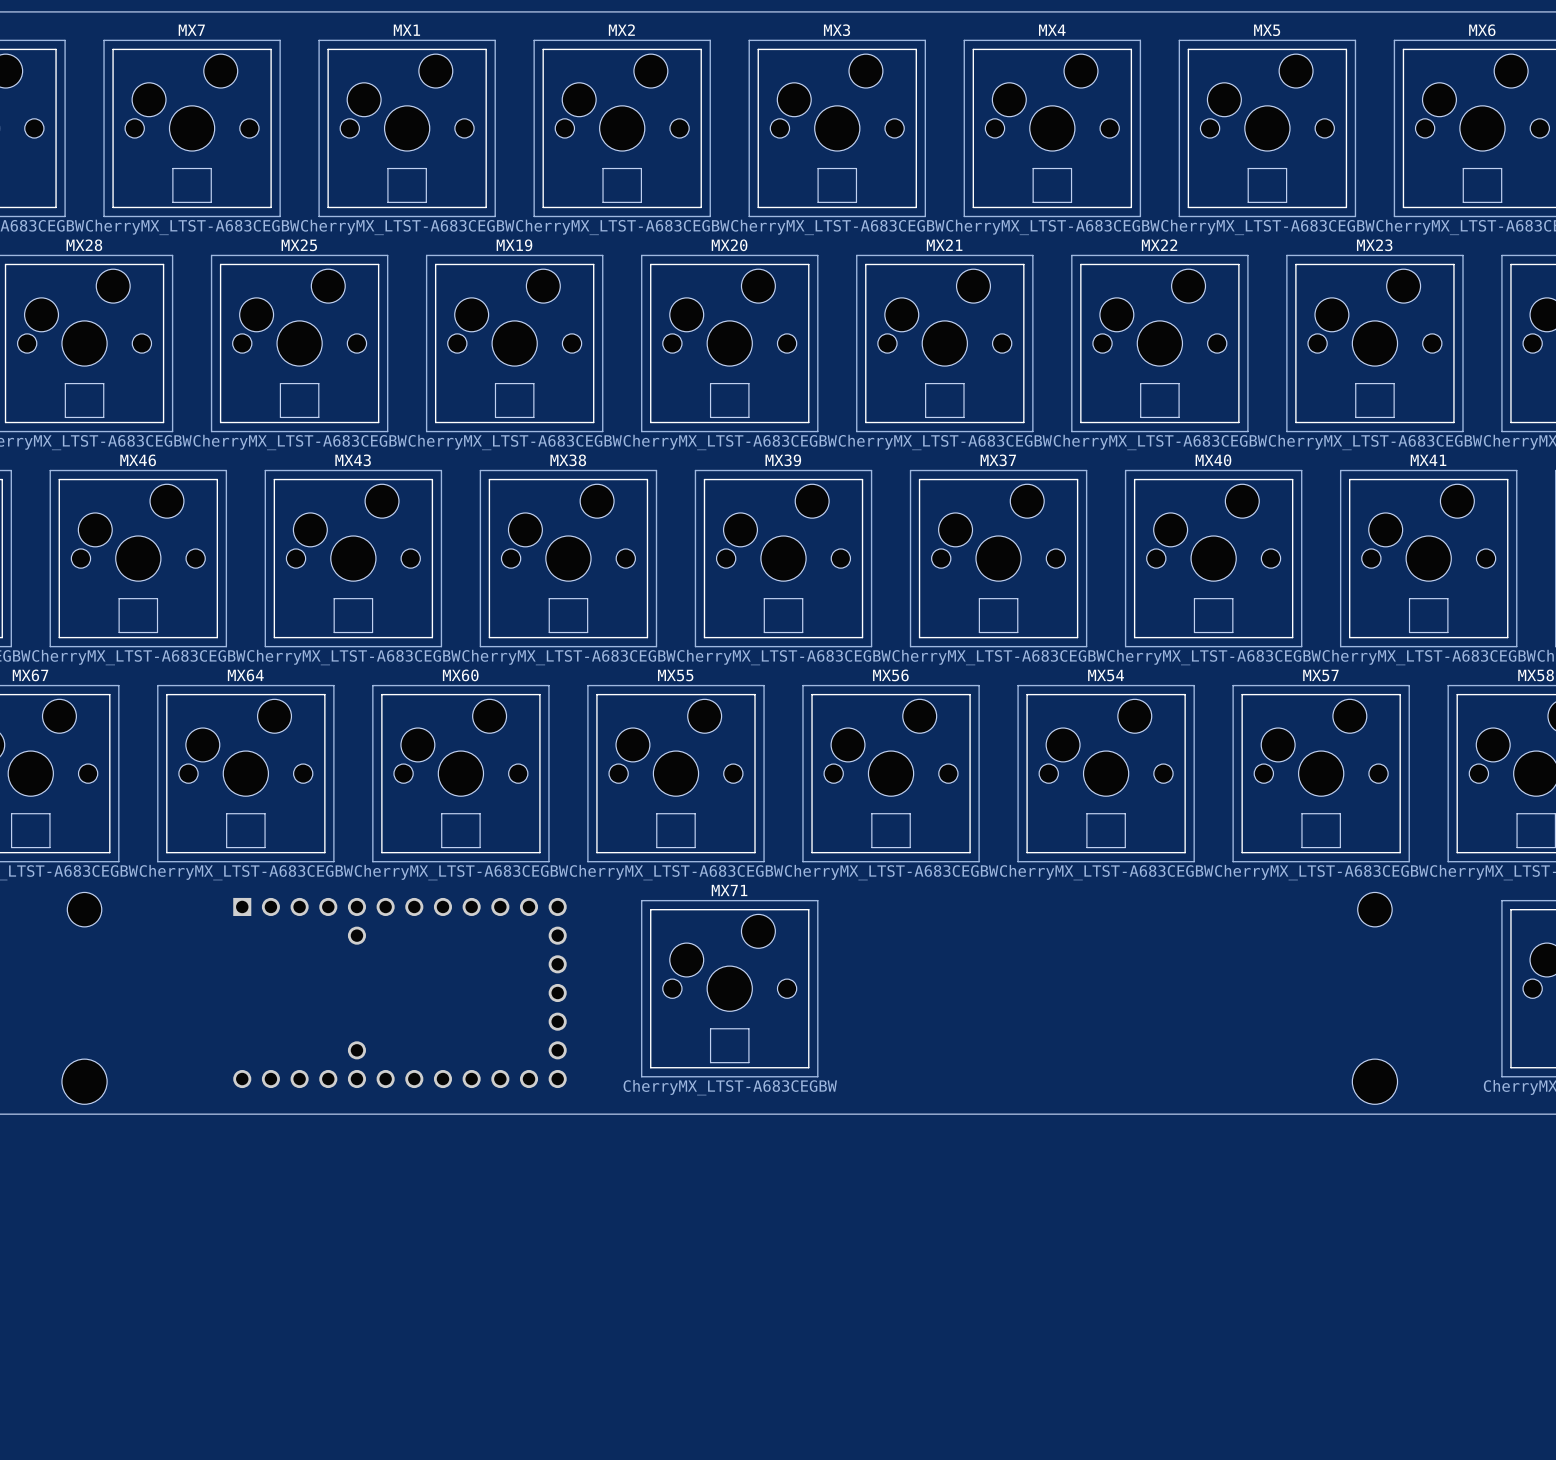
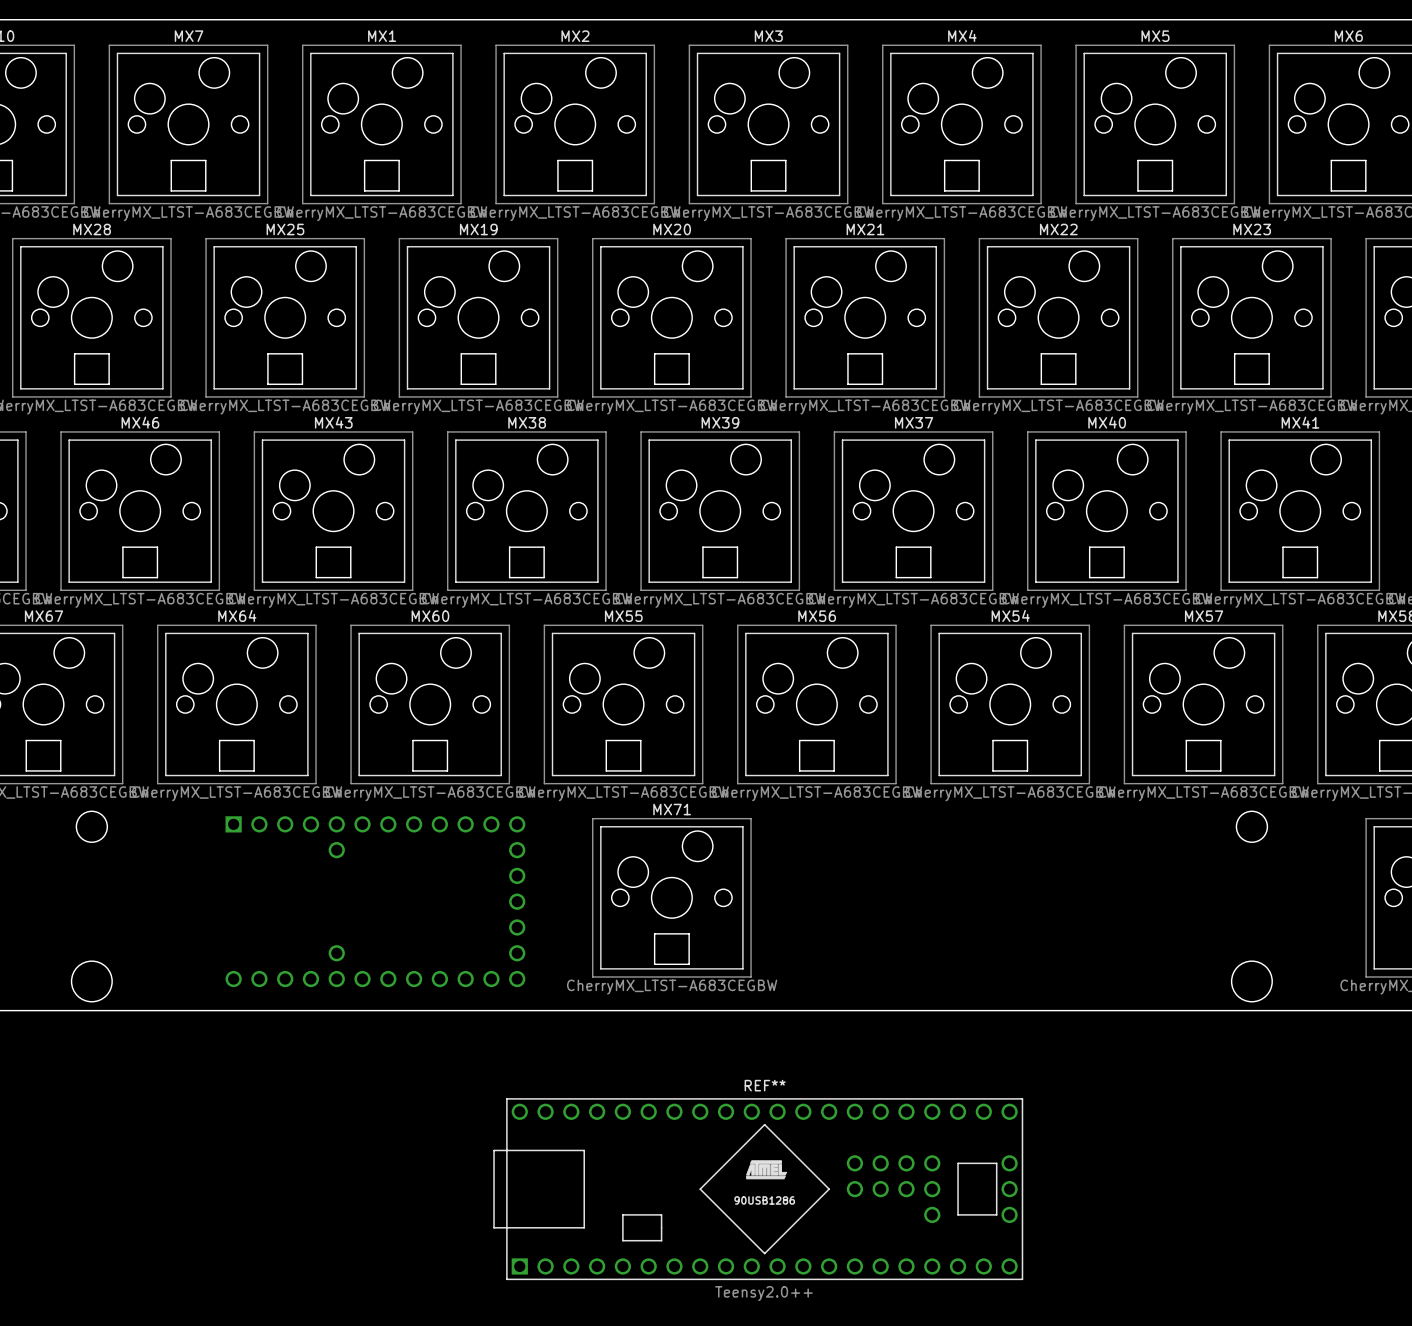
REF**: none -> Teensy2.0++ (758, 1189)

